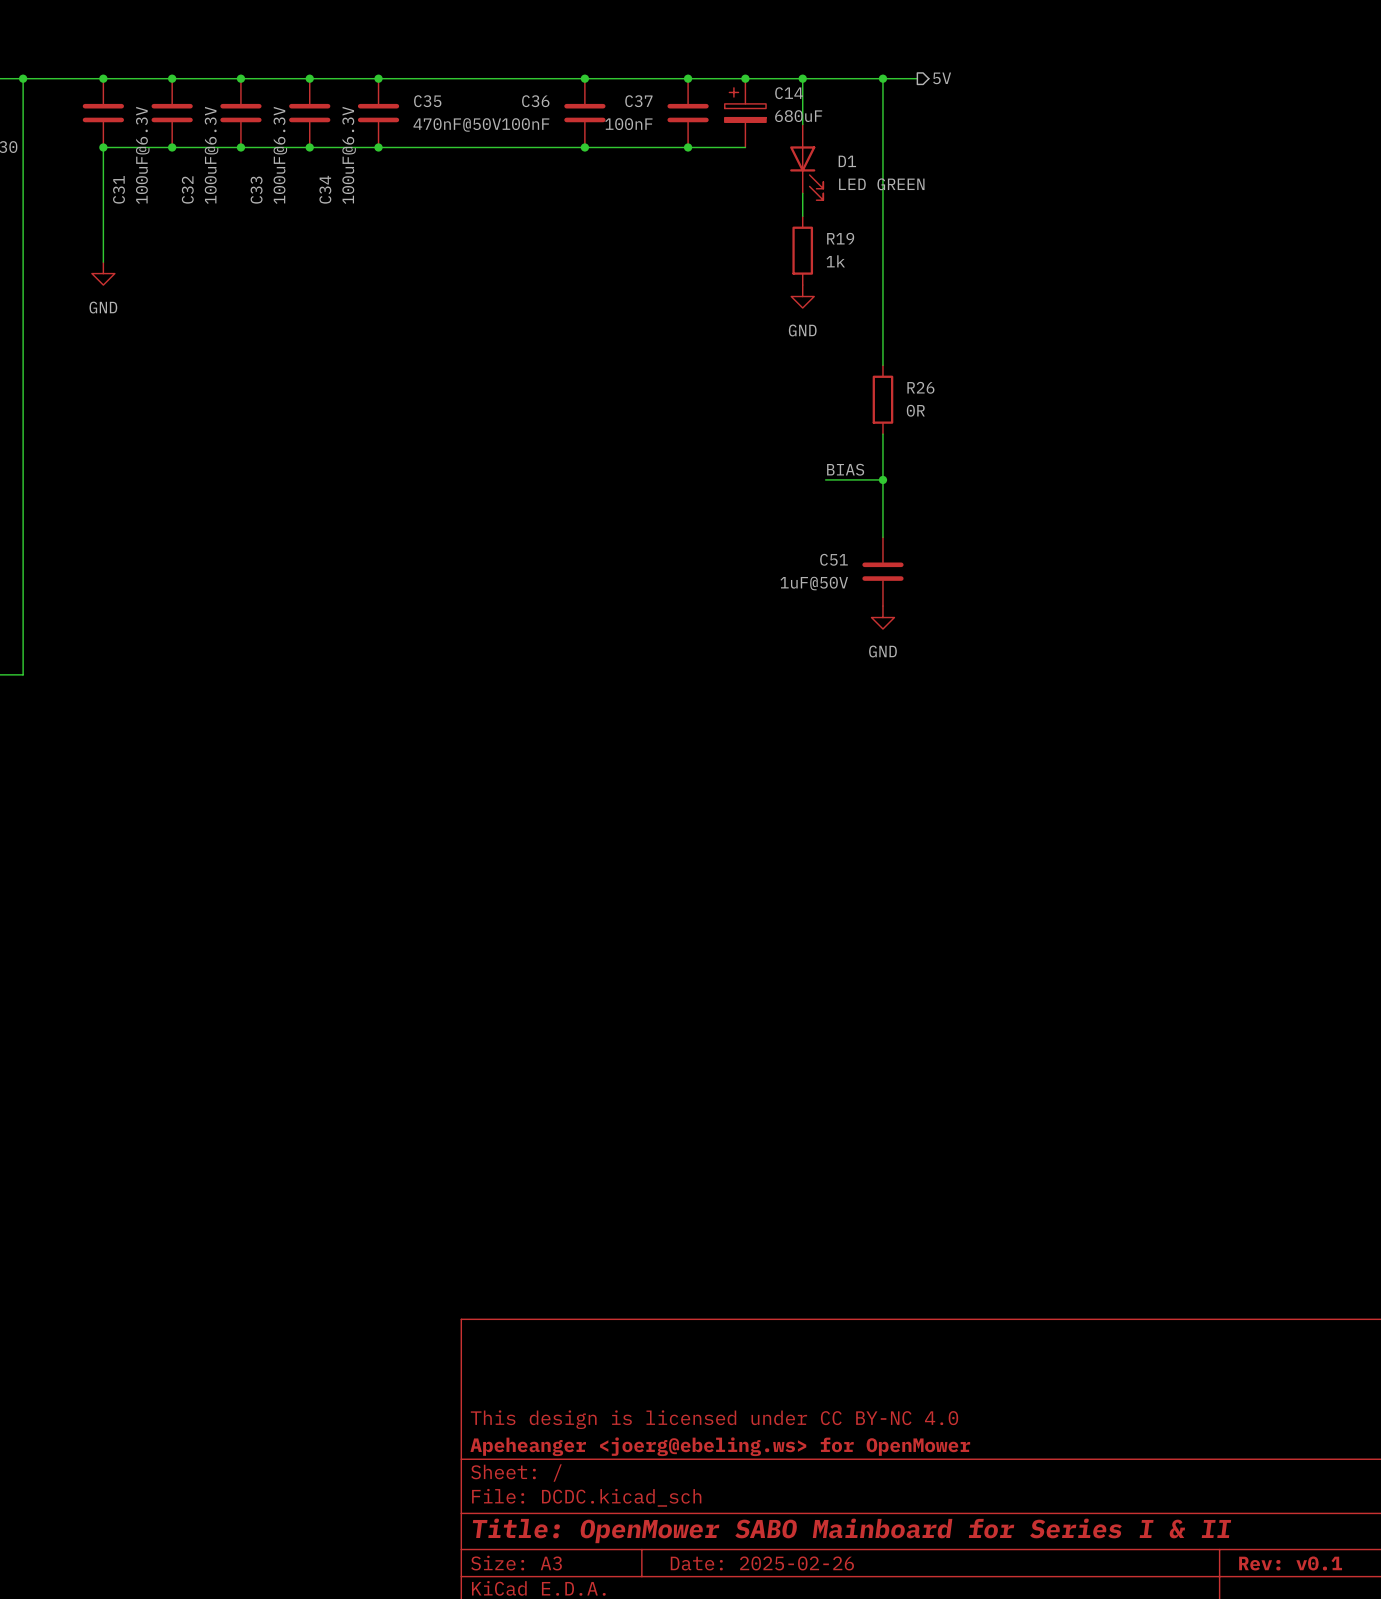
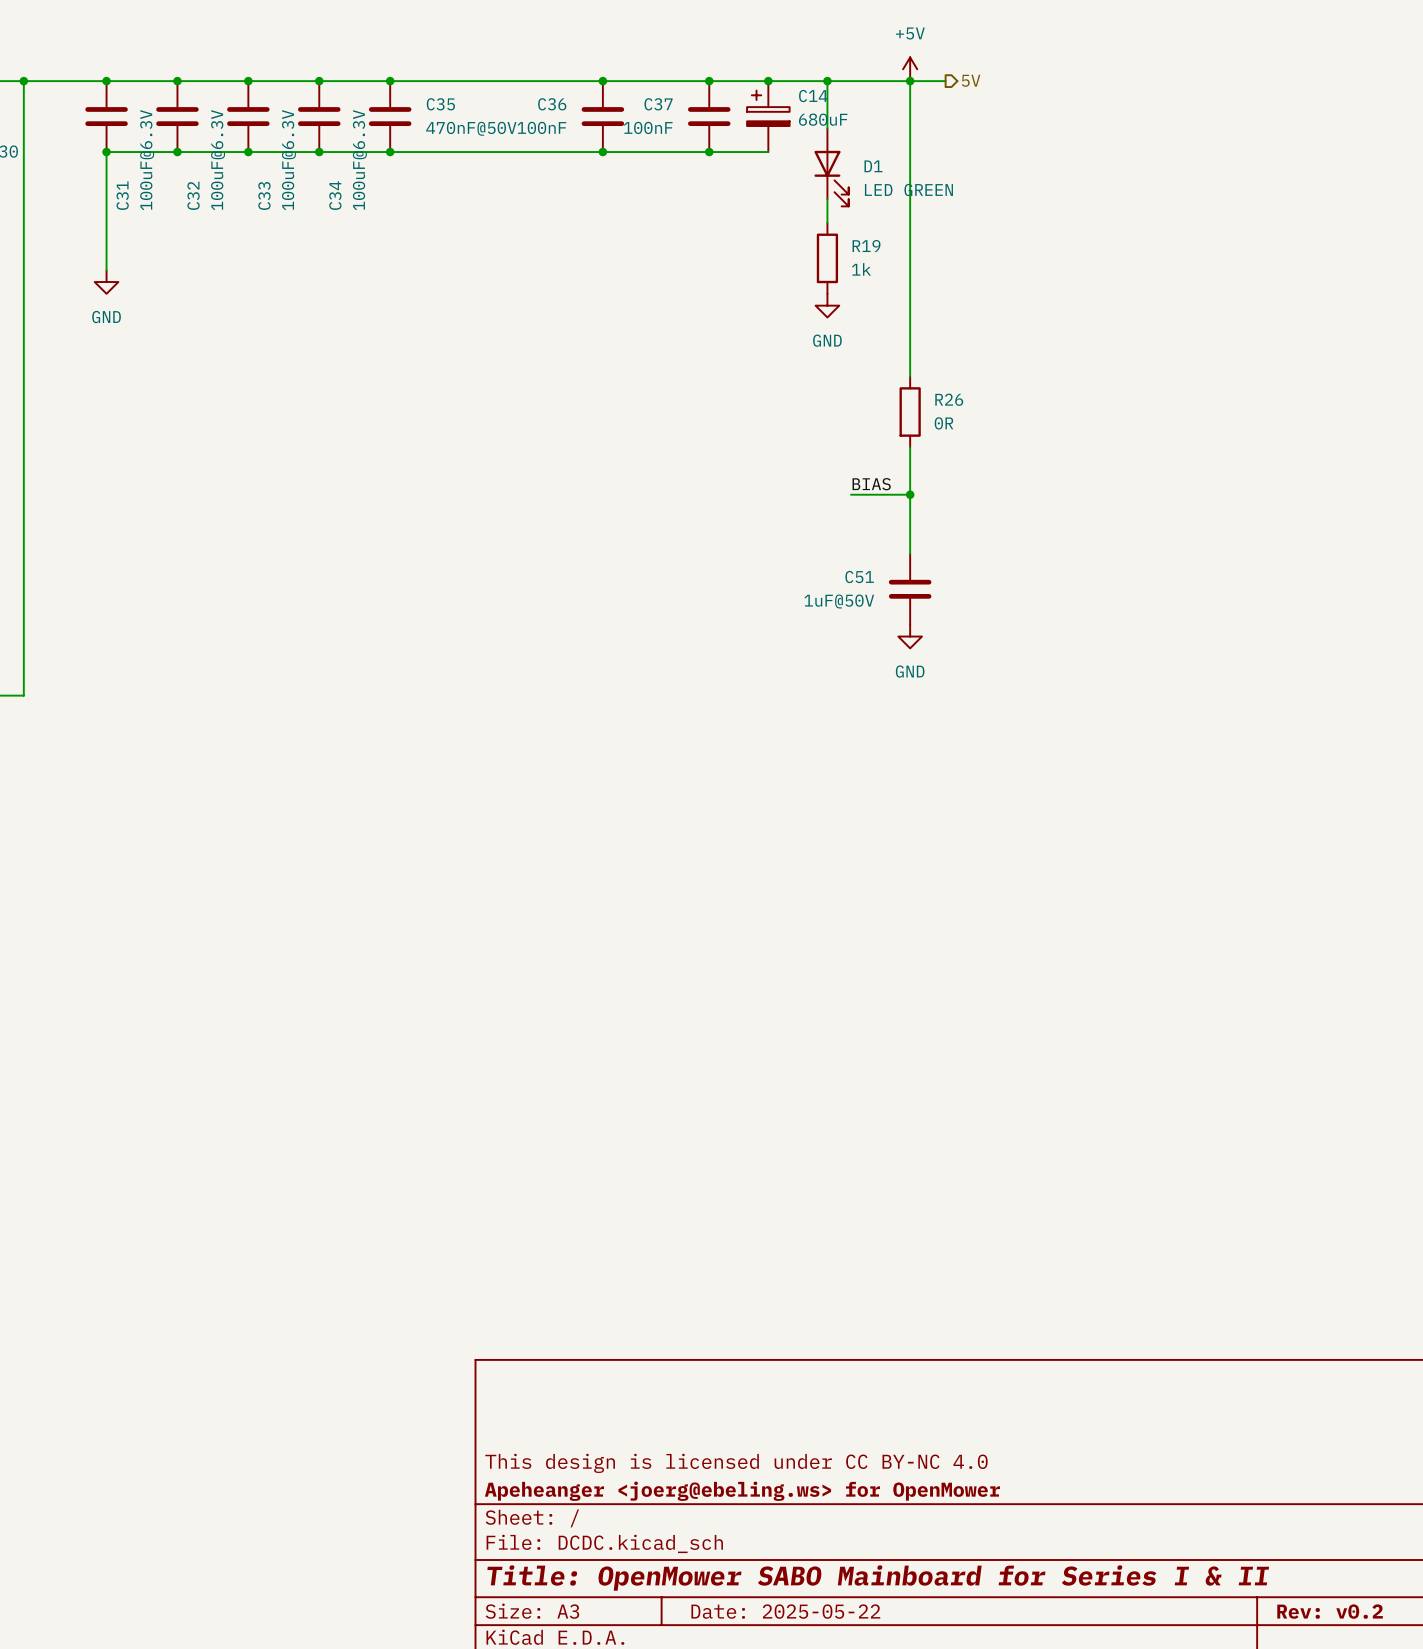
power symbol: none -> +5V (910, 69)
title block: Date: 2025-02-26 (762, 1563) -> Date: 2025-05-22 (785, 1611)
title block: Rev: v0.1 (1290, 1563) -> Rev: v0.2 (1330, 1611)

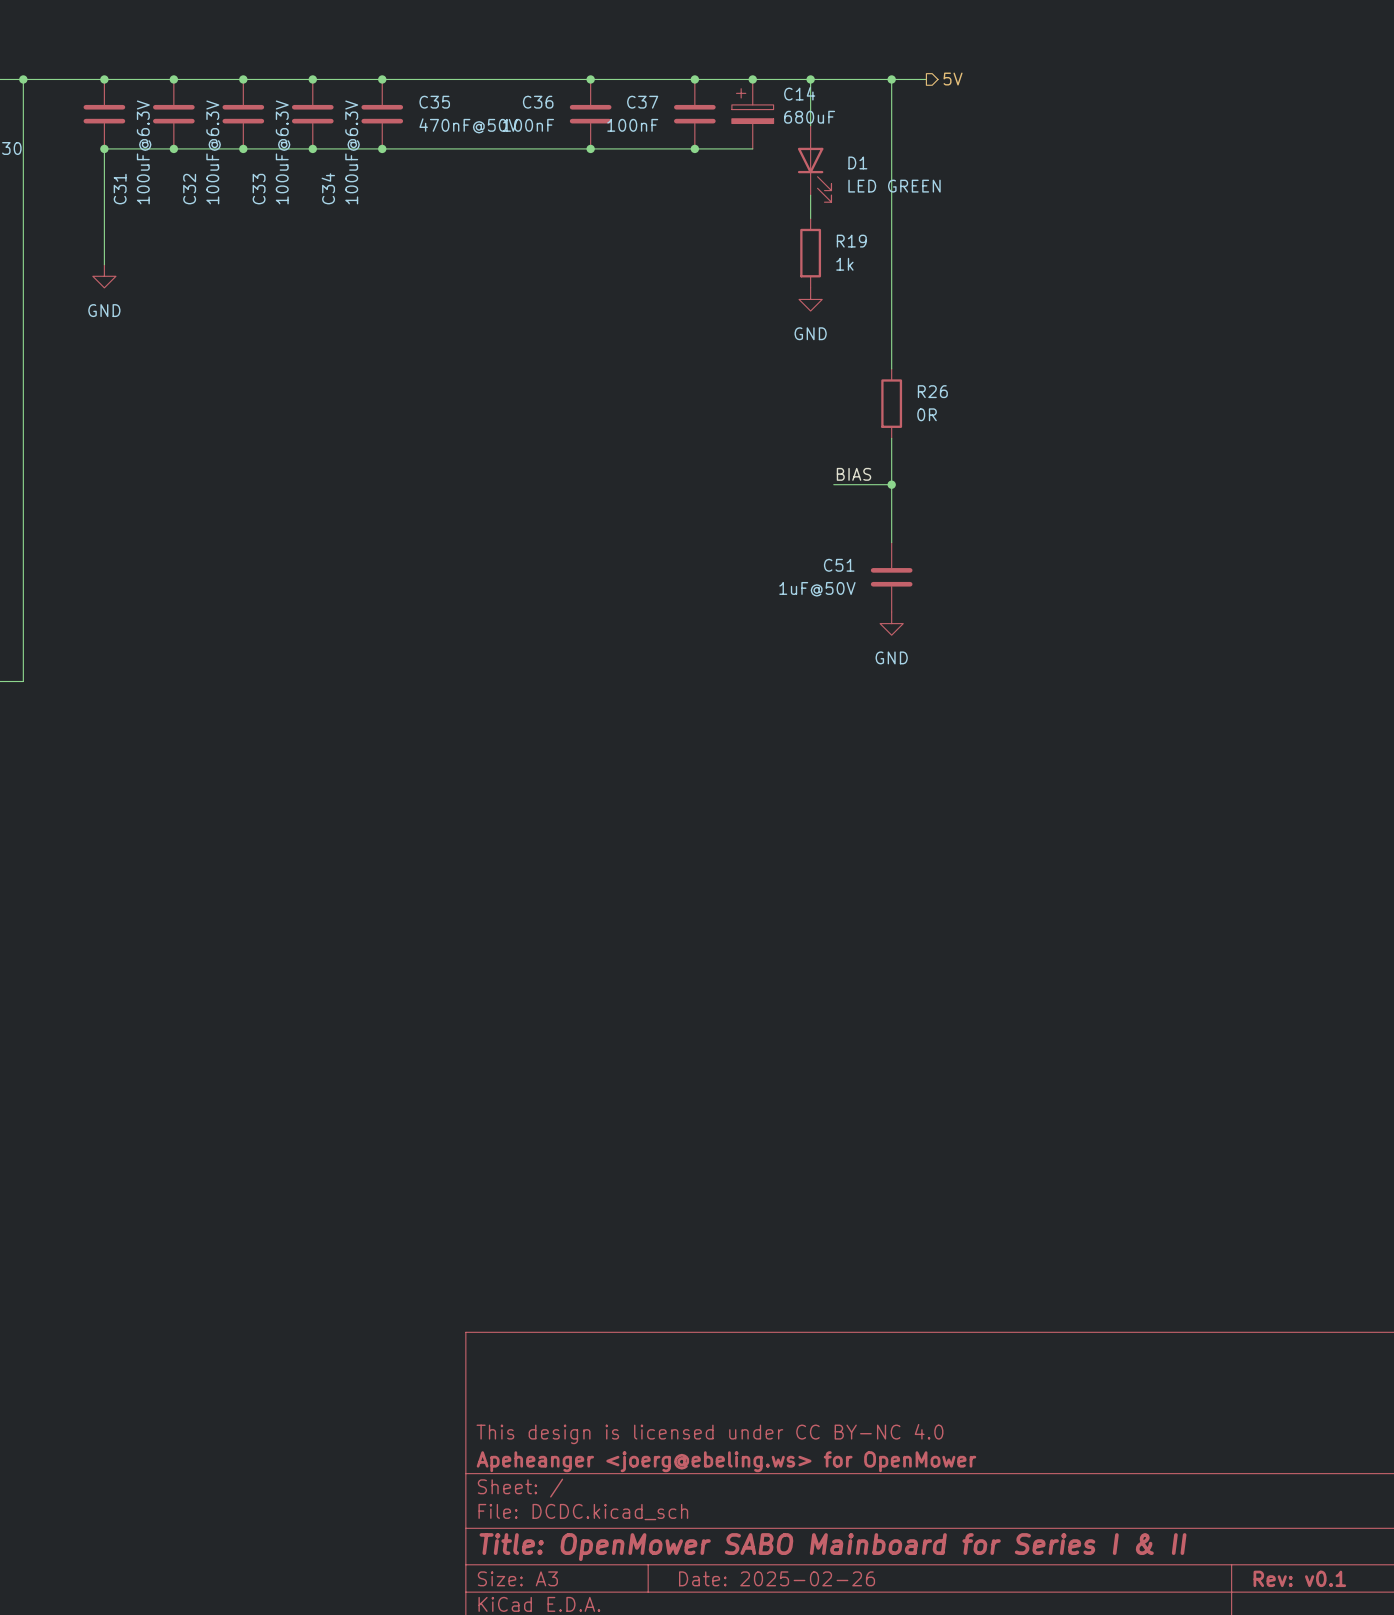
power symbol: +5V (910, 69) -> none
title block: Date: 2025-05-22 (785, 1611) -> Date: 2025-02-26 (777, 1578)
title block: Rev: v0.2 (1330, 1611) -> Rev: v0.1 (1299, 1578)

